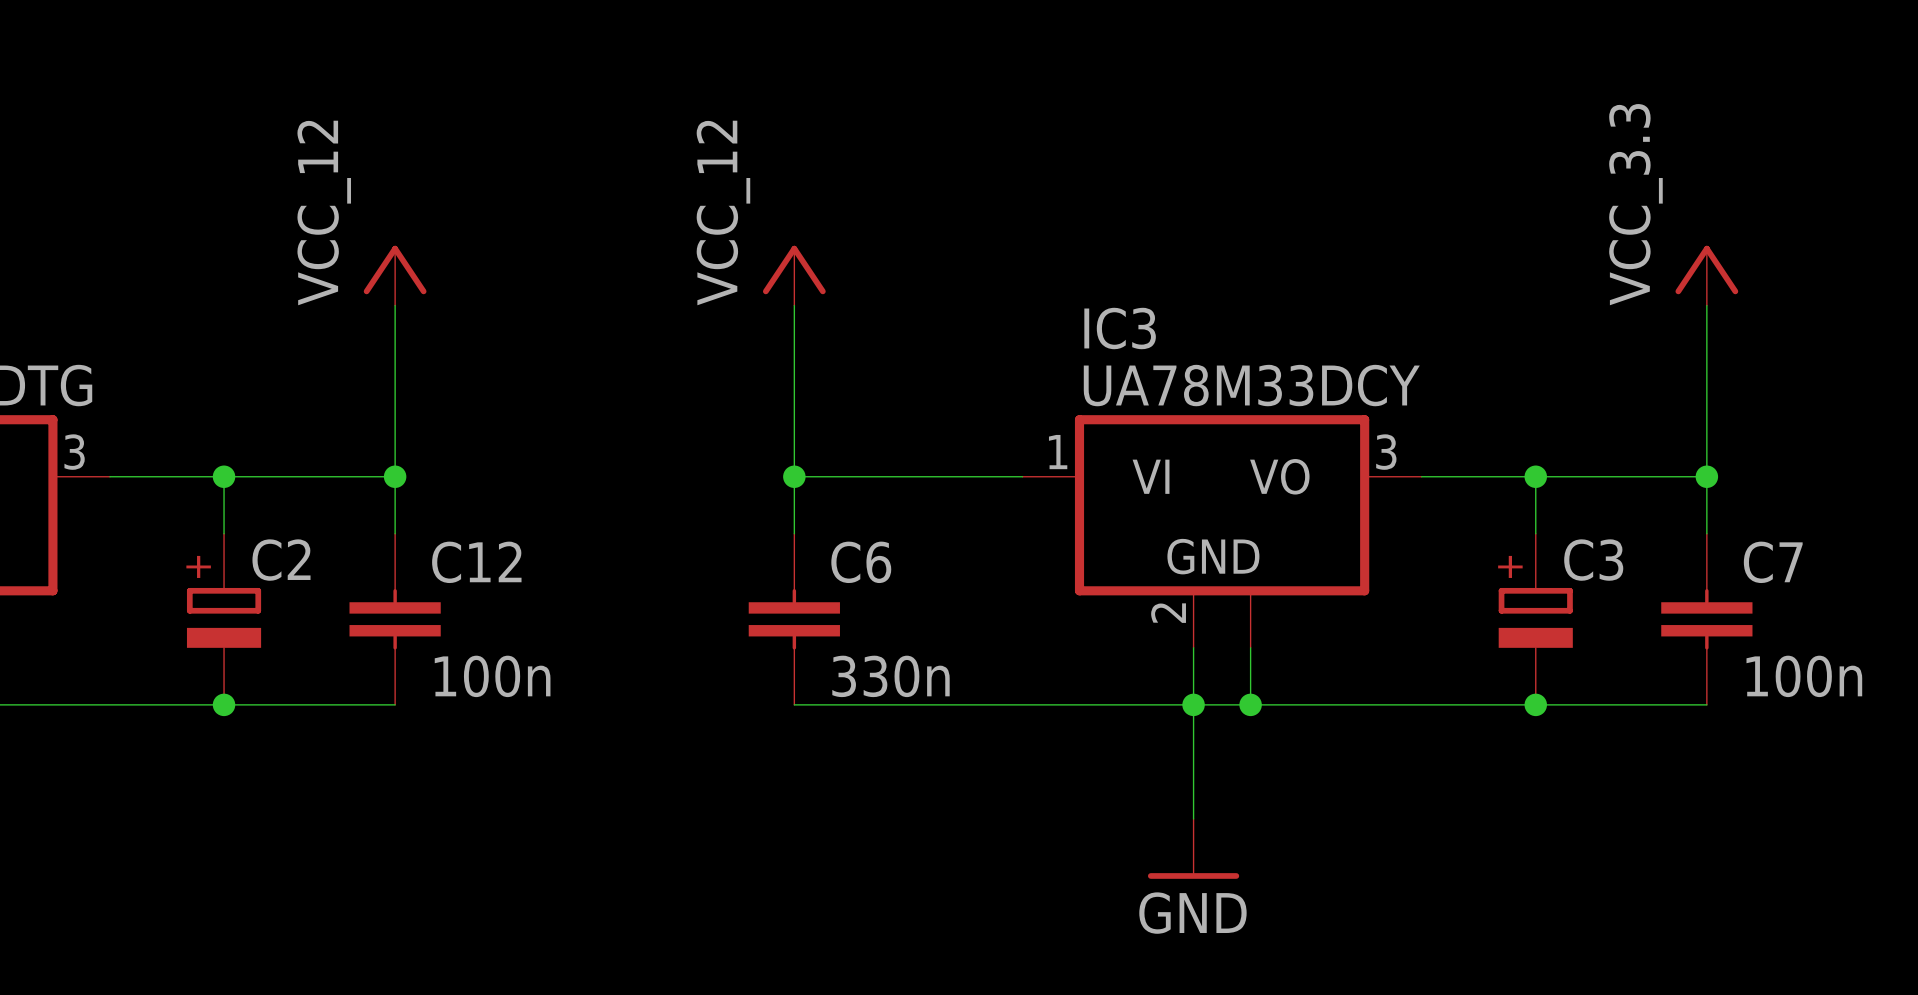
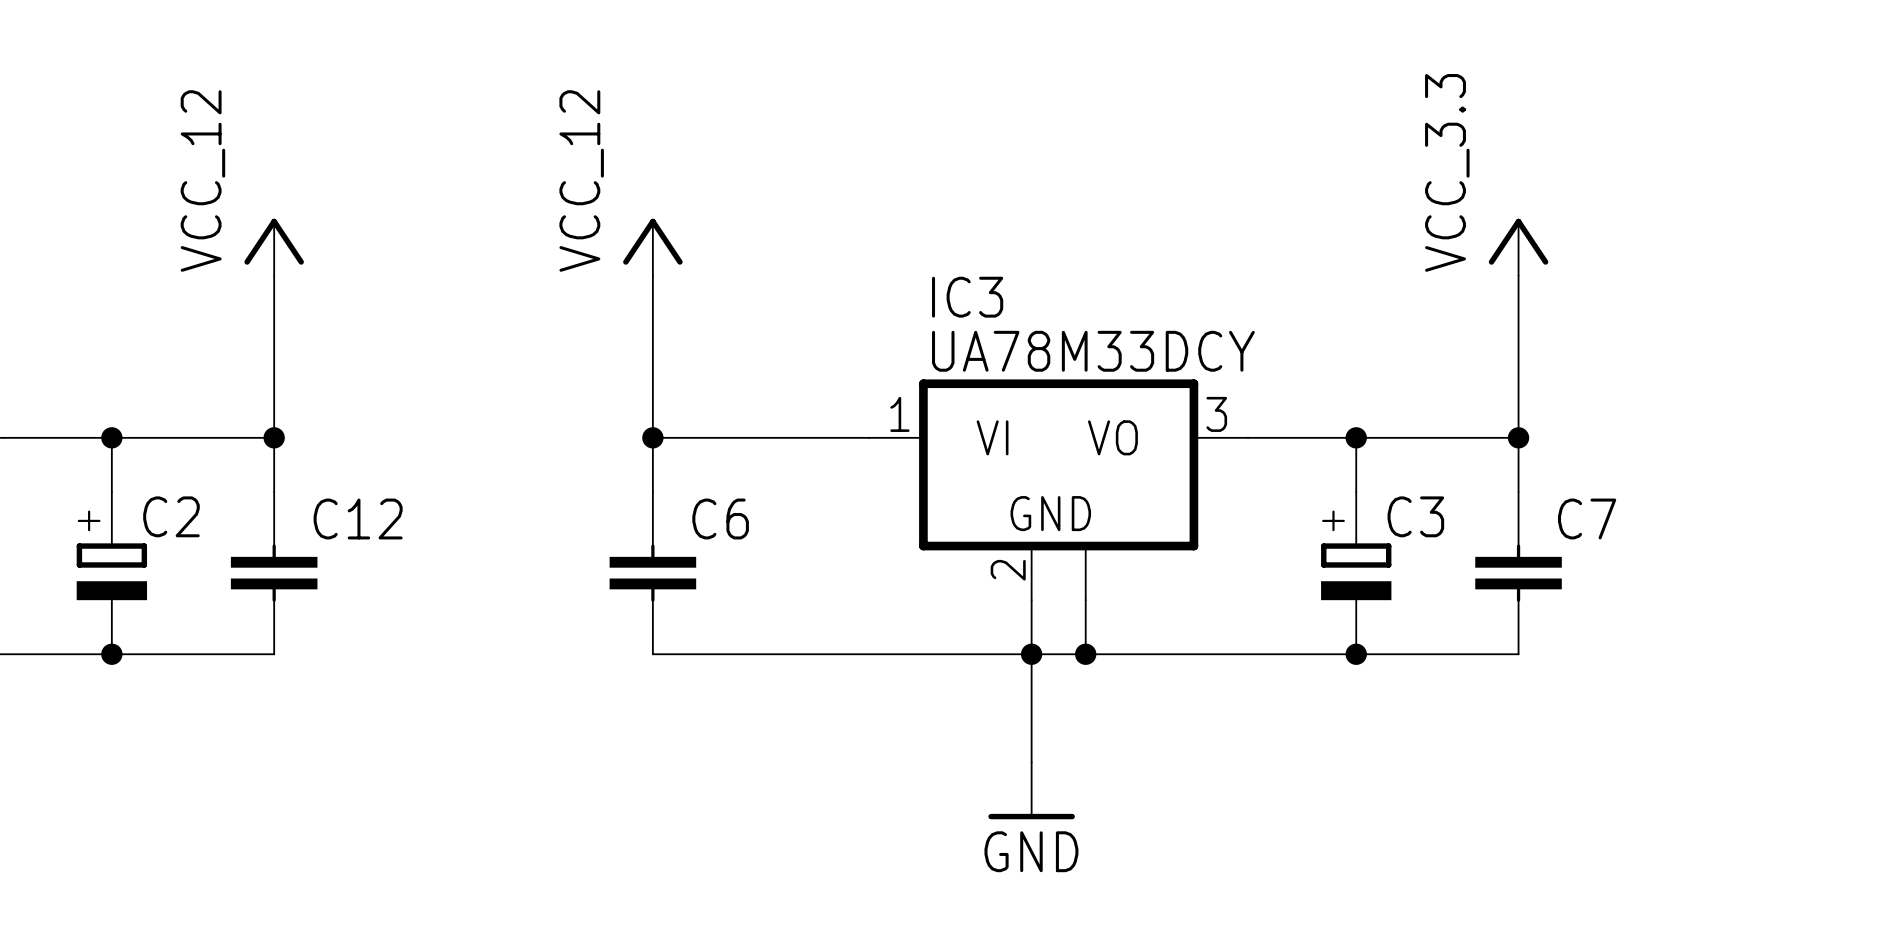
C12 value: 100n (492, 676) -> none
C6 value: 330n (891, 676) -> none
C7 value: 100n (1804, 676) -> none

